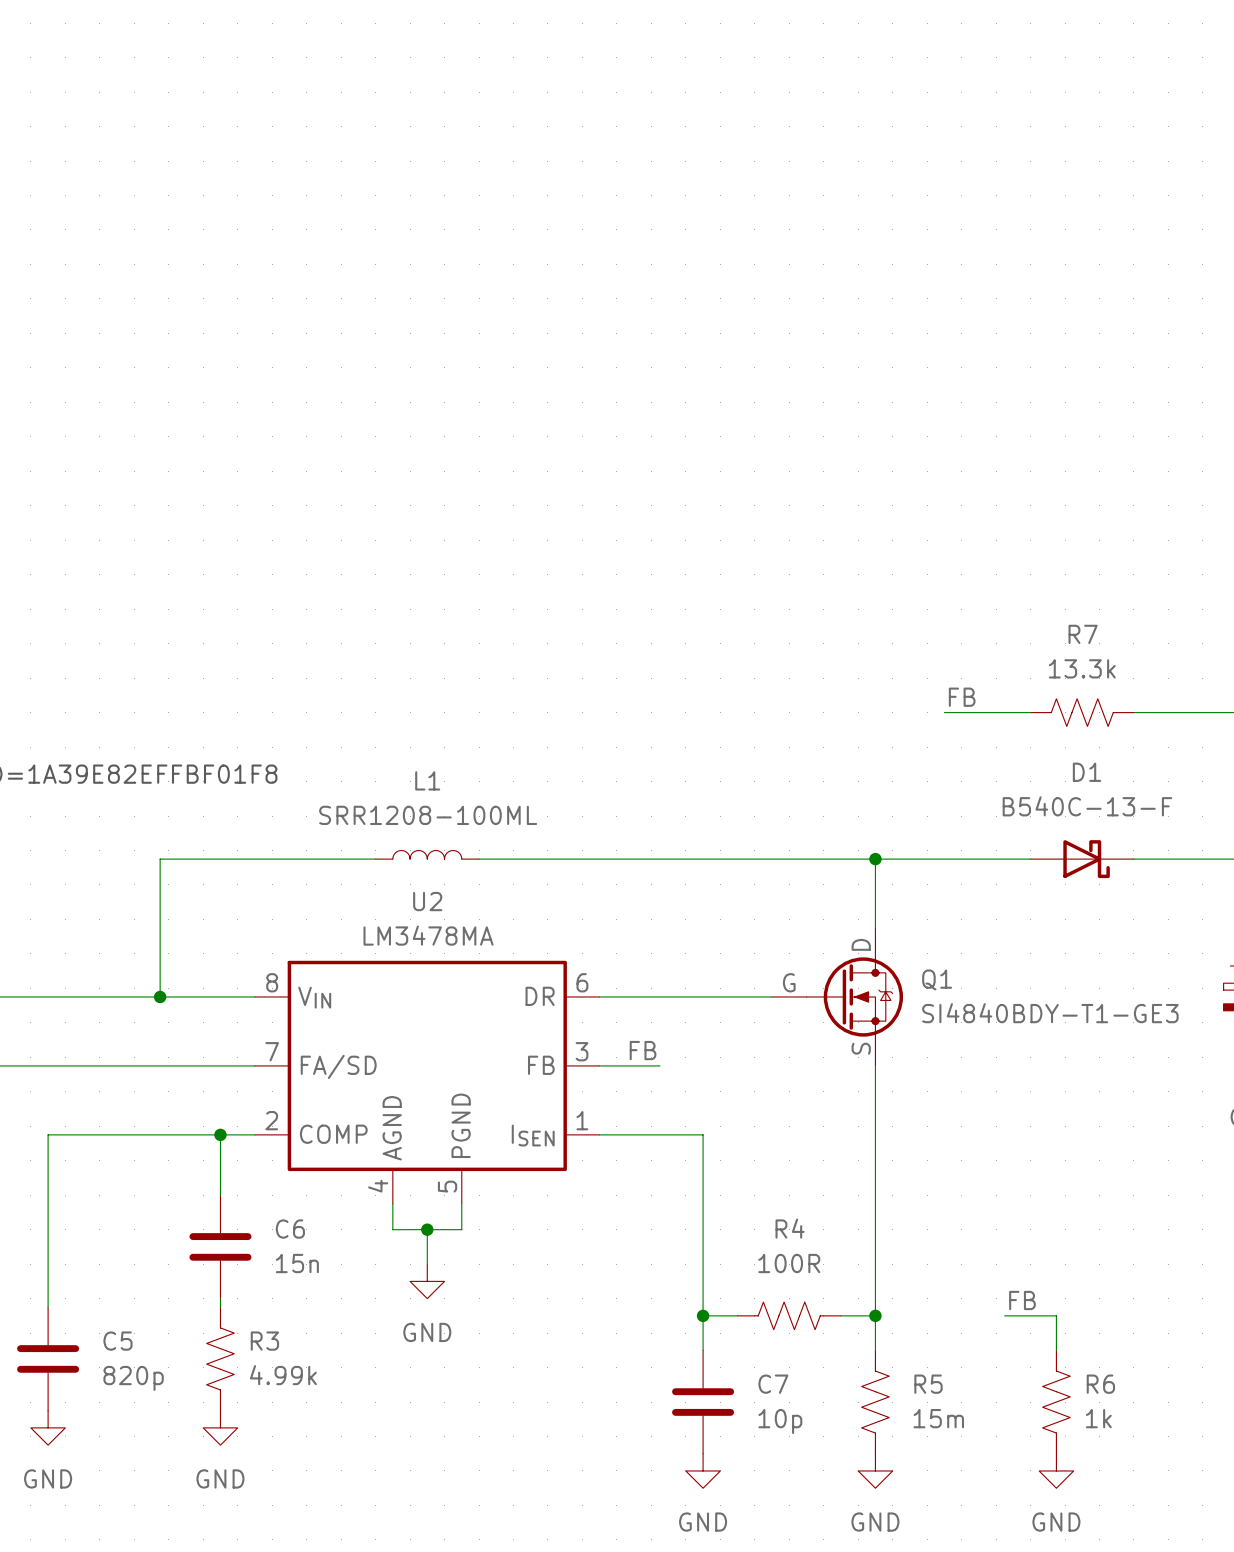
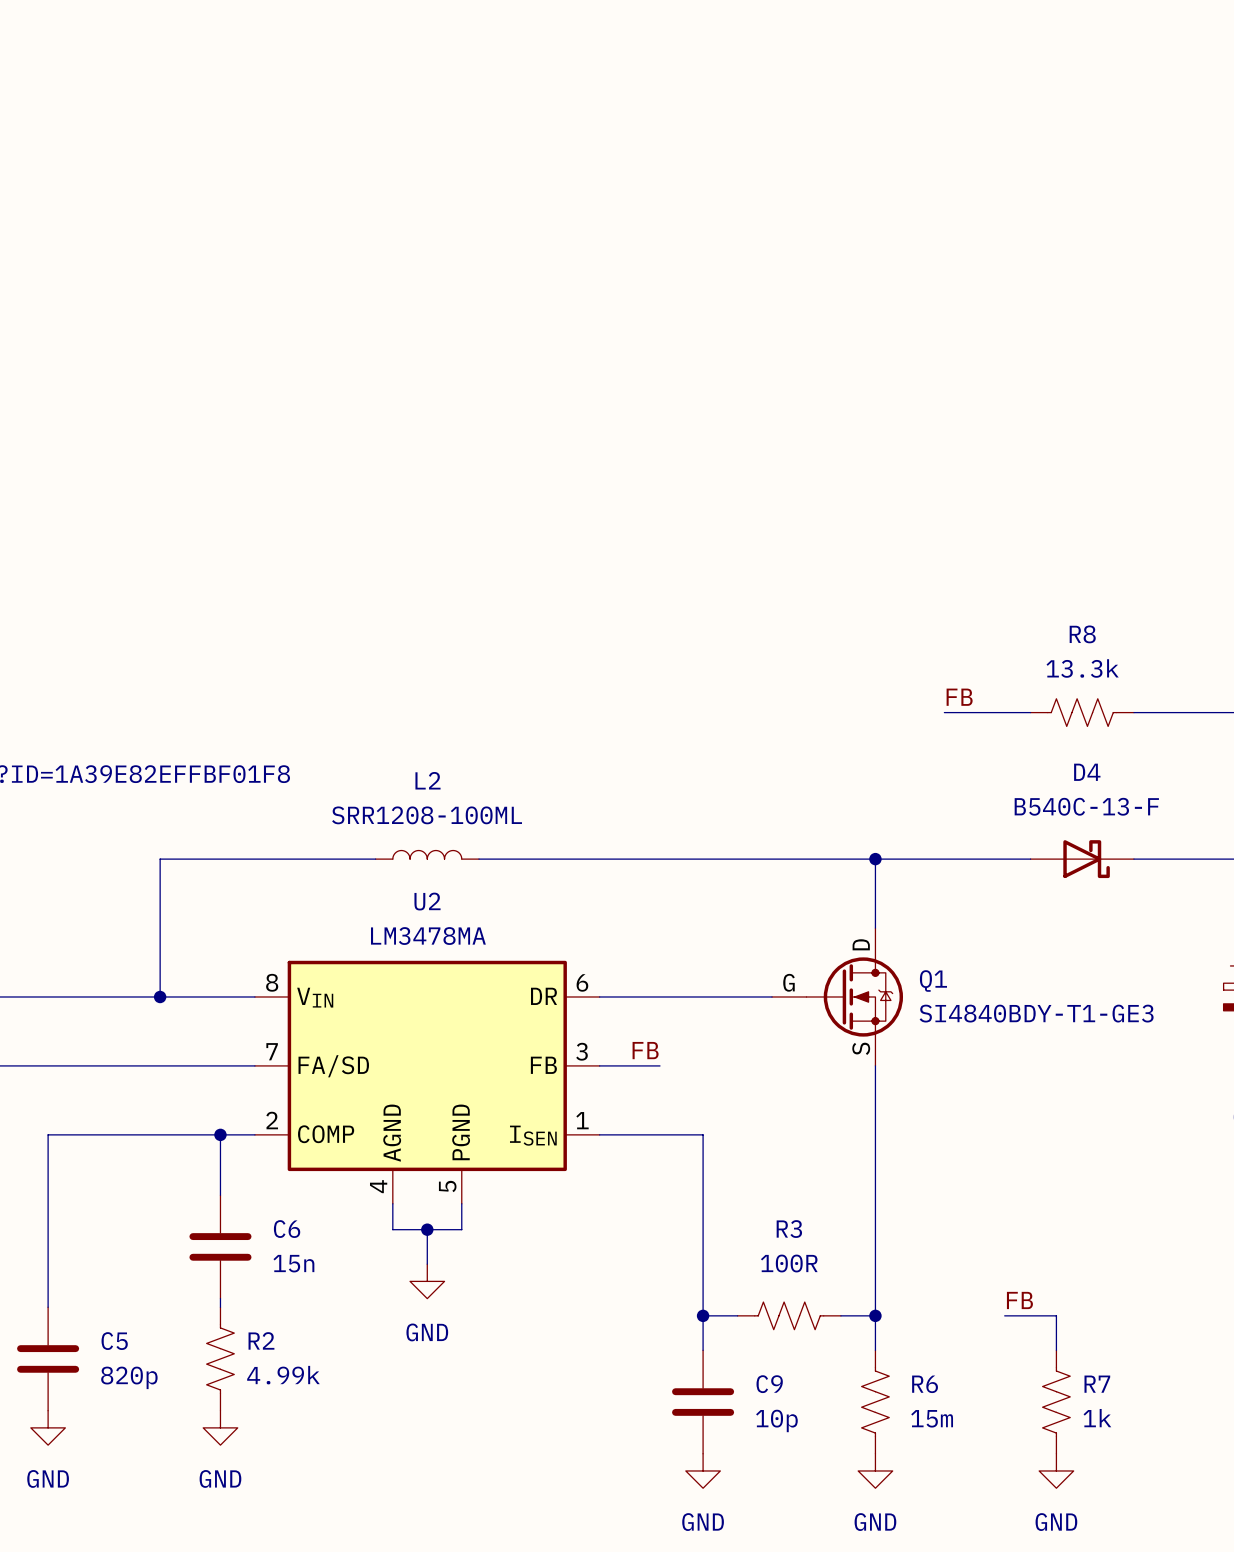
R7 name: R7 (1083, 634) -> R8 (1082, 634)
D1 name: D1 (1086, 772) -> D4 (1087, 772)
L1 name: L1 (427, 780) -> L2 (428, 780)
R4 name: R4 (790, 1228) -> R3 (789, 1229)
R3 name: R3 (264, 1341) -> R2 (261, 1340)
C7 name: C7 (773, 1384) -> C9 (769, 1384)
R5 name: R5 (928, 1384) -> R6 (925, 1384)
R6 name: R6 (1100, 1384) -> R7 (1097, 1384)

